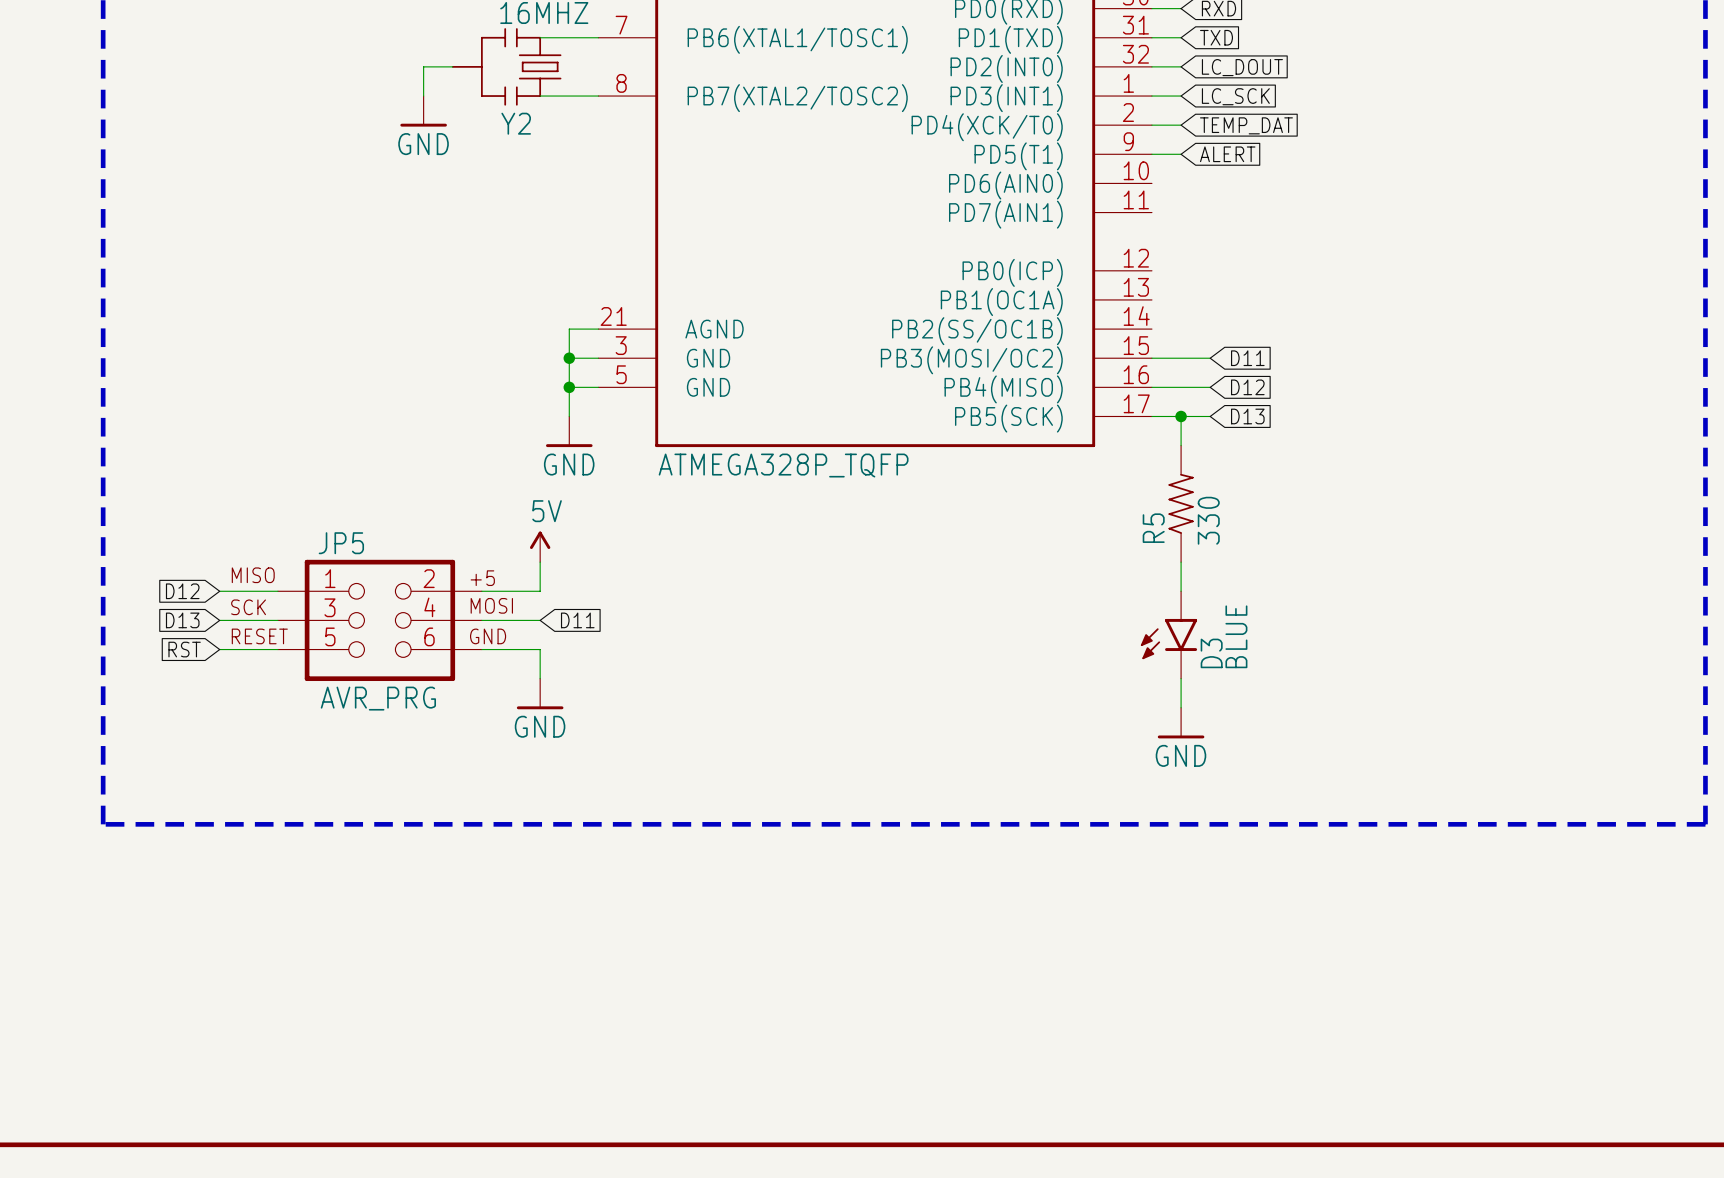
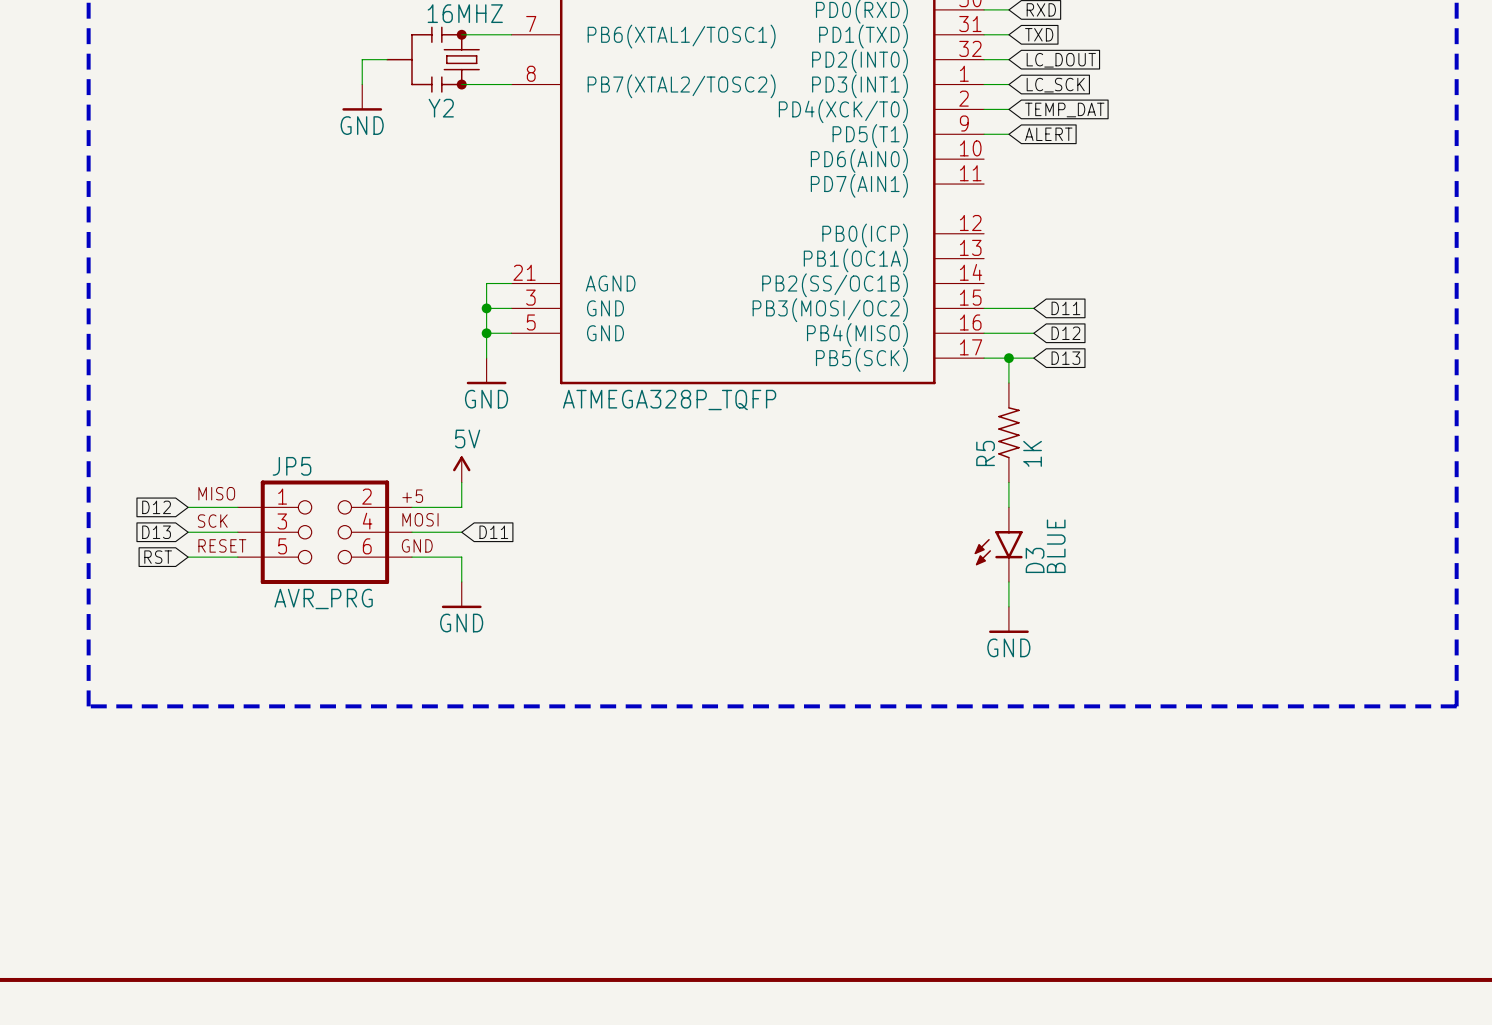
Y2 symbol: [451, 28, 562, 106] -> [386, 26, 480, 93]
R5 value: 330 (1208, 520) -> 1K (1032, 453)

